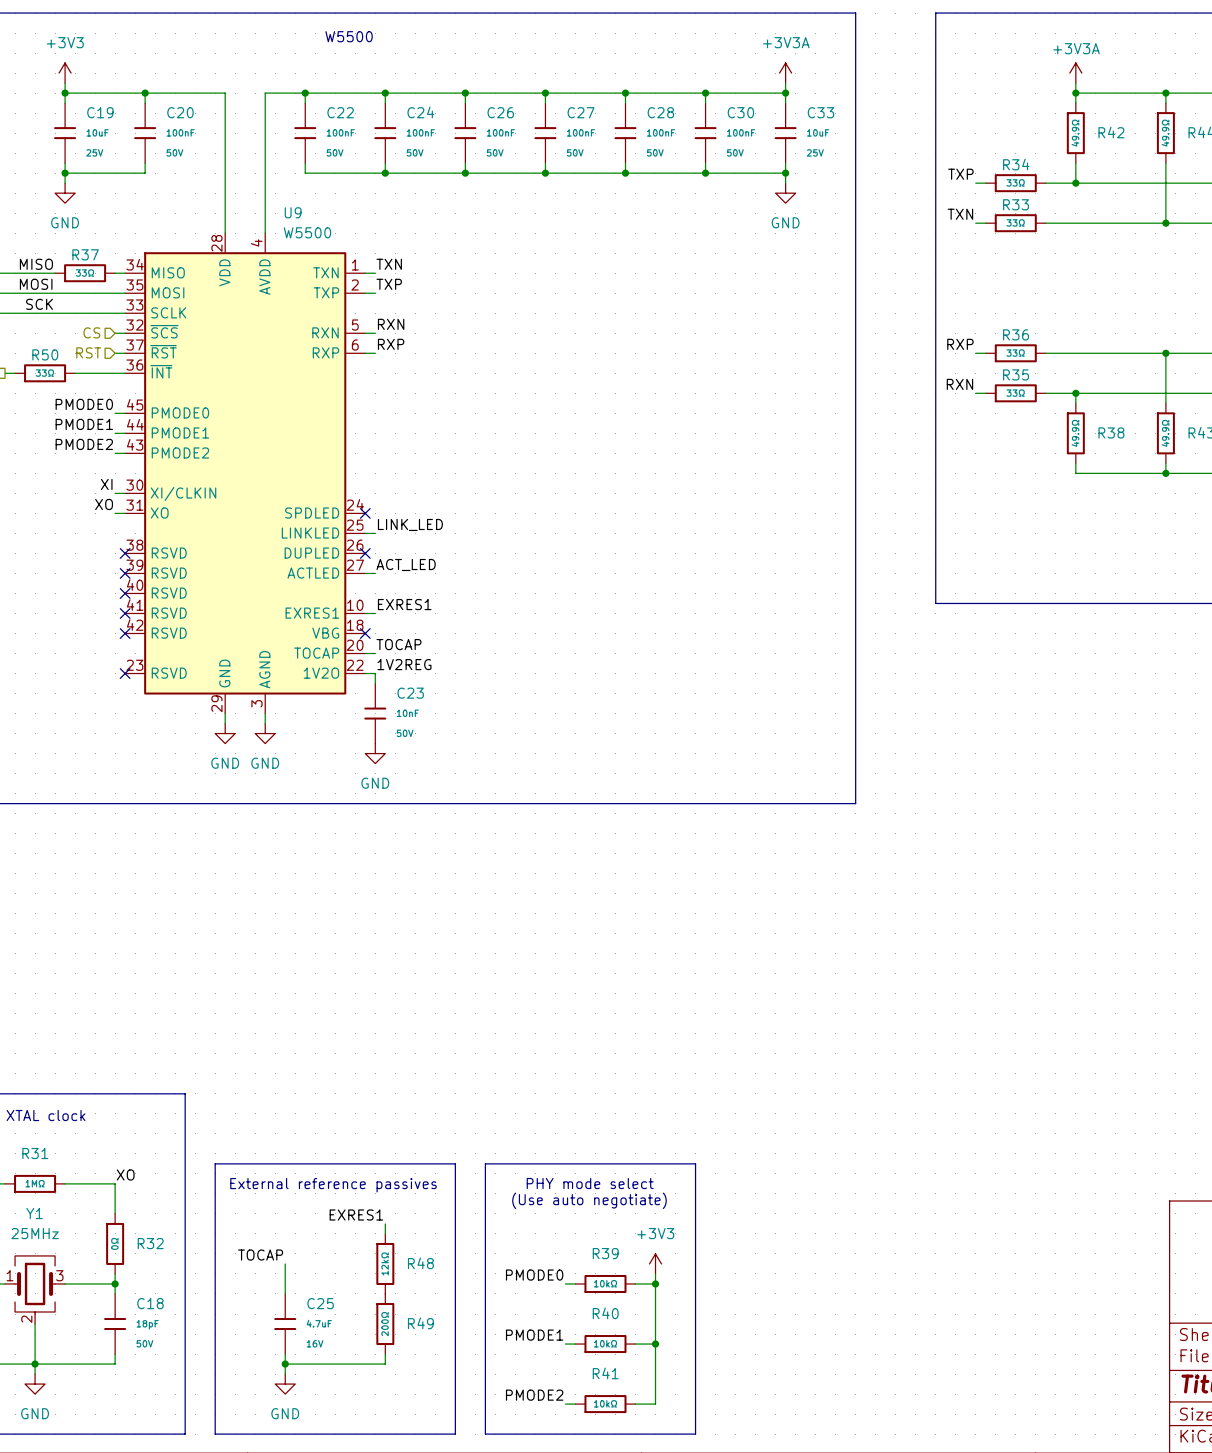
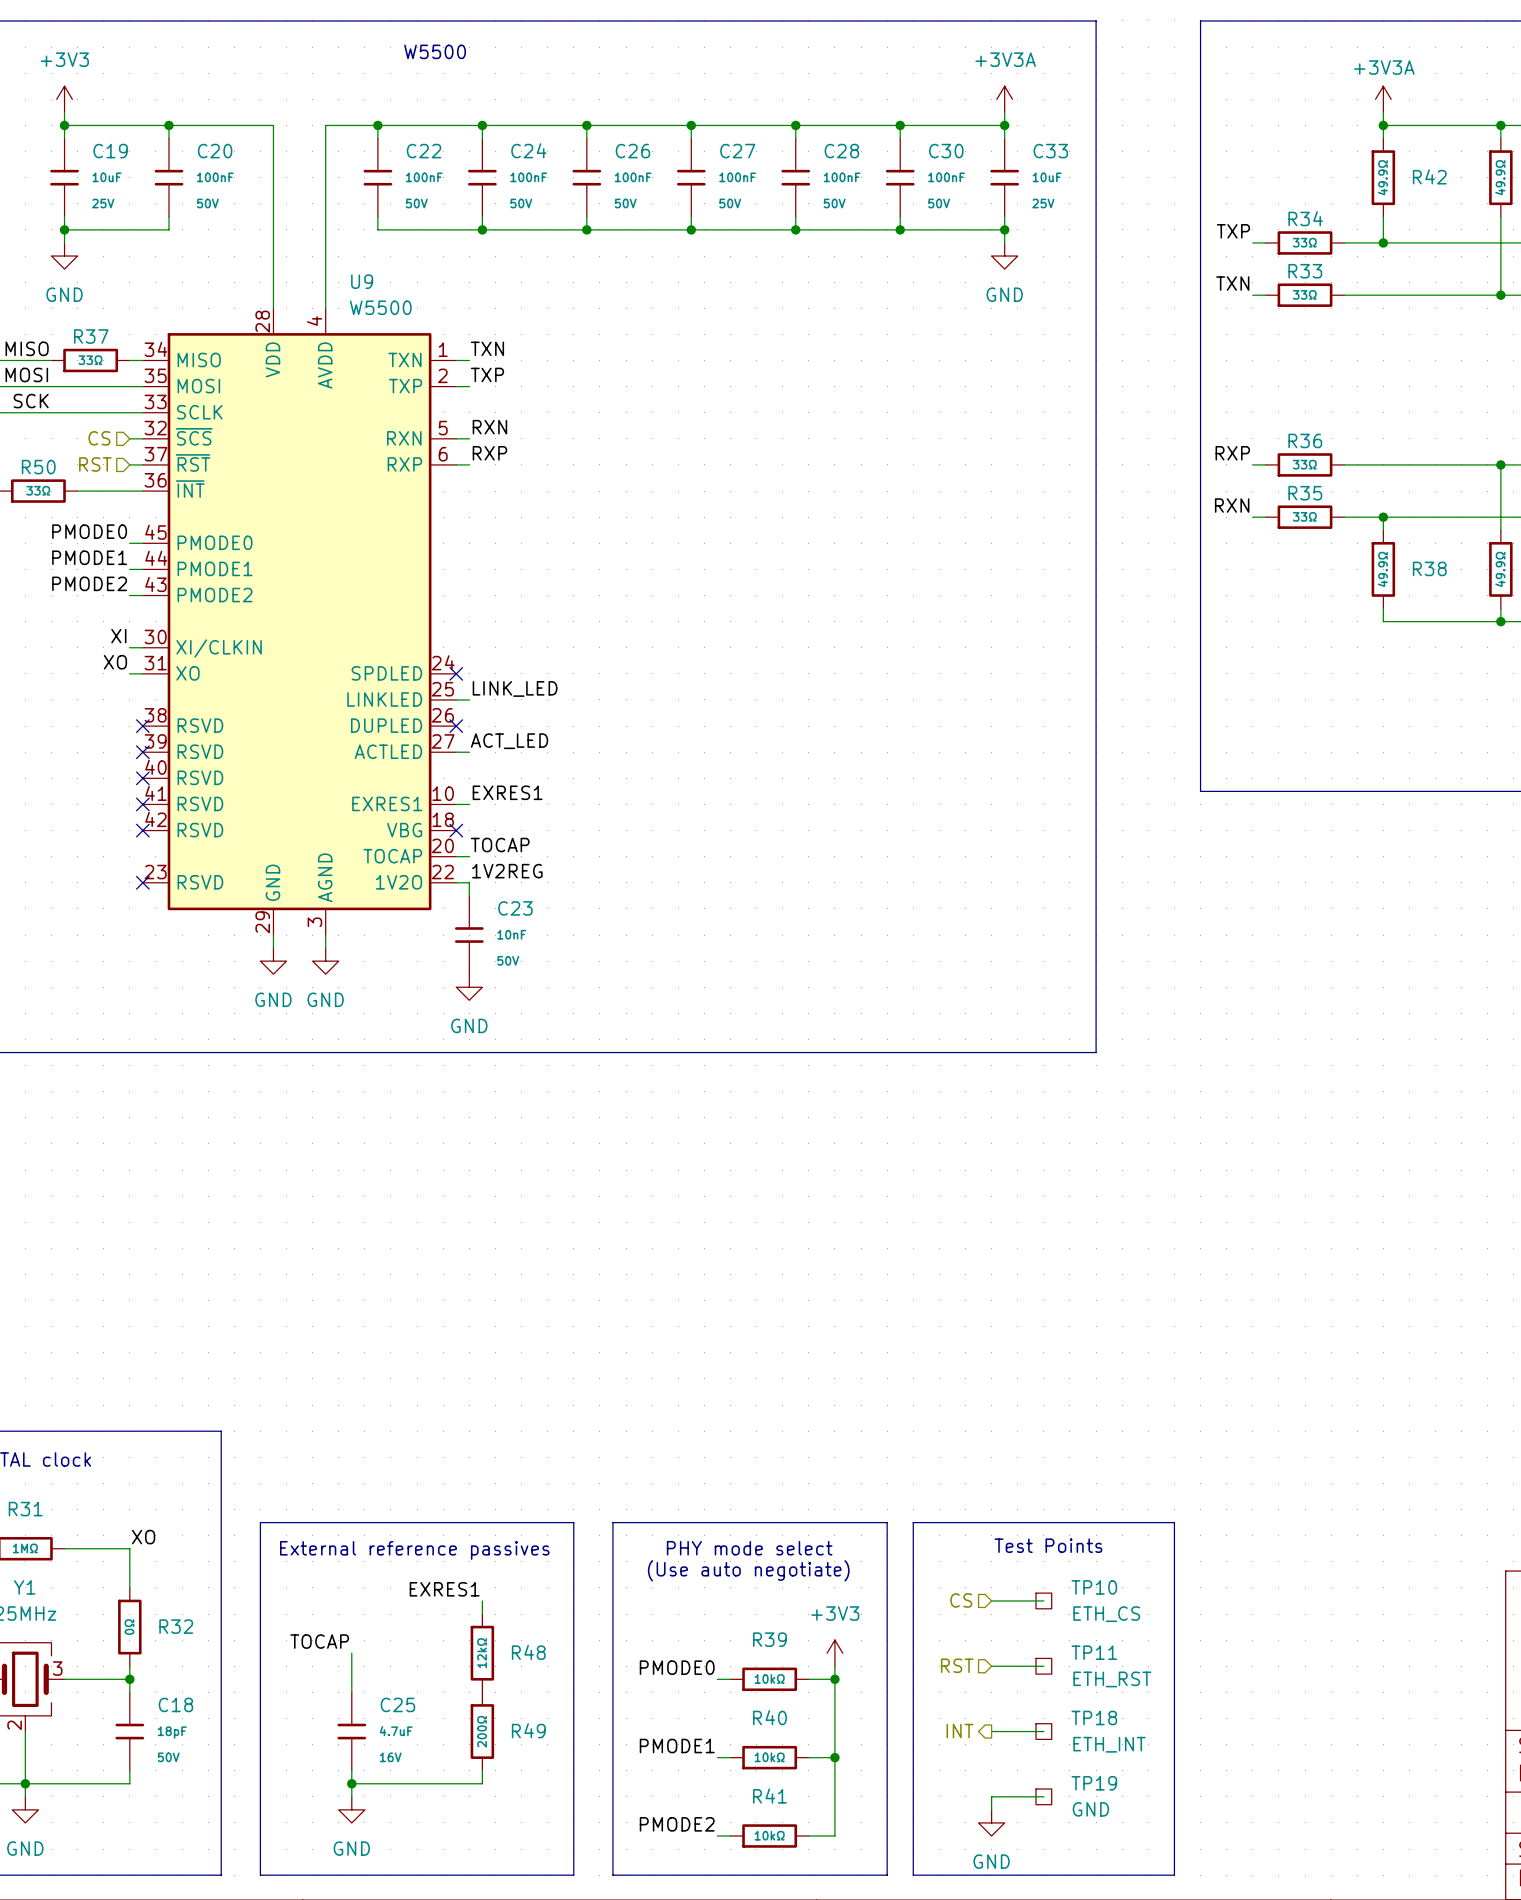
line: none -> (913, 1522) (1174, 1522) (1174, 1875) (913, 1875) (913, 1522)
text: none -> Test Points (1048, 1545)
hierarchical label: none -> CS (961, 1600)
wire: none -> (991, 1600) (1043, 1600)
TP10: none -> ETH_CS (1043, 1600)
hierarchical label: none -> RST (957, 1665)
wire: none -> (991, 1666) (1043, 1666)
TP11: none -> ETH_RST (1043, 1666)
hierarchical label: none -> INT (960, 1731)
wire: none -> (991, 1731) (1043, 1731)
TP18: none -> ETH_INT (1043, 1731)
wire: none -> (1043, 1796) (991, 1796) (991, 1809)
TP19: none -> GND (1043, 1796)
power symbol: none -> GND (991, 1822)

